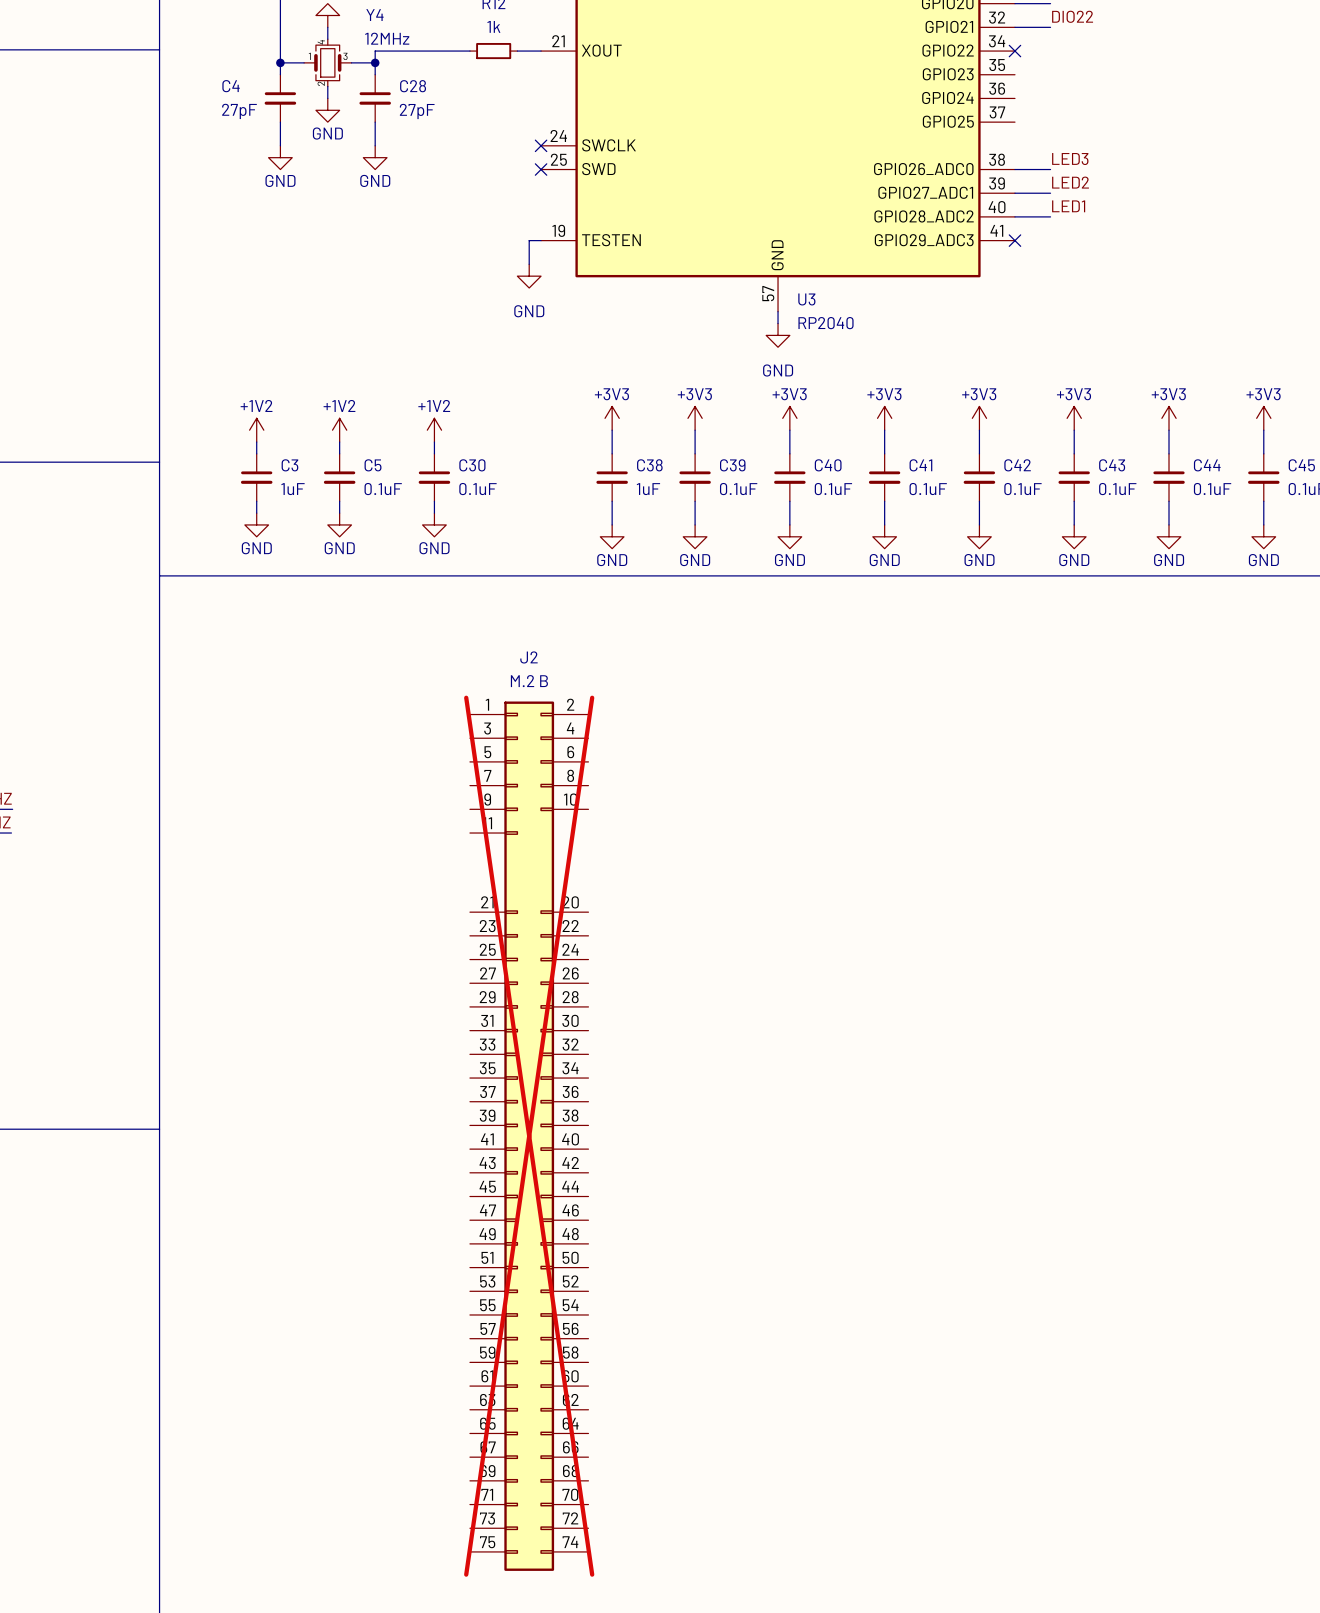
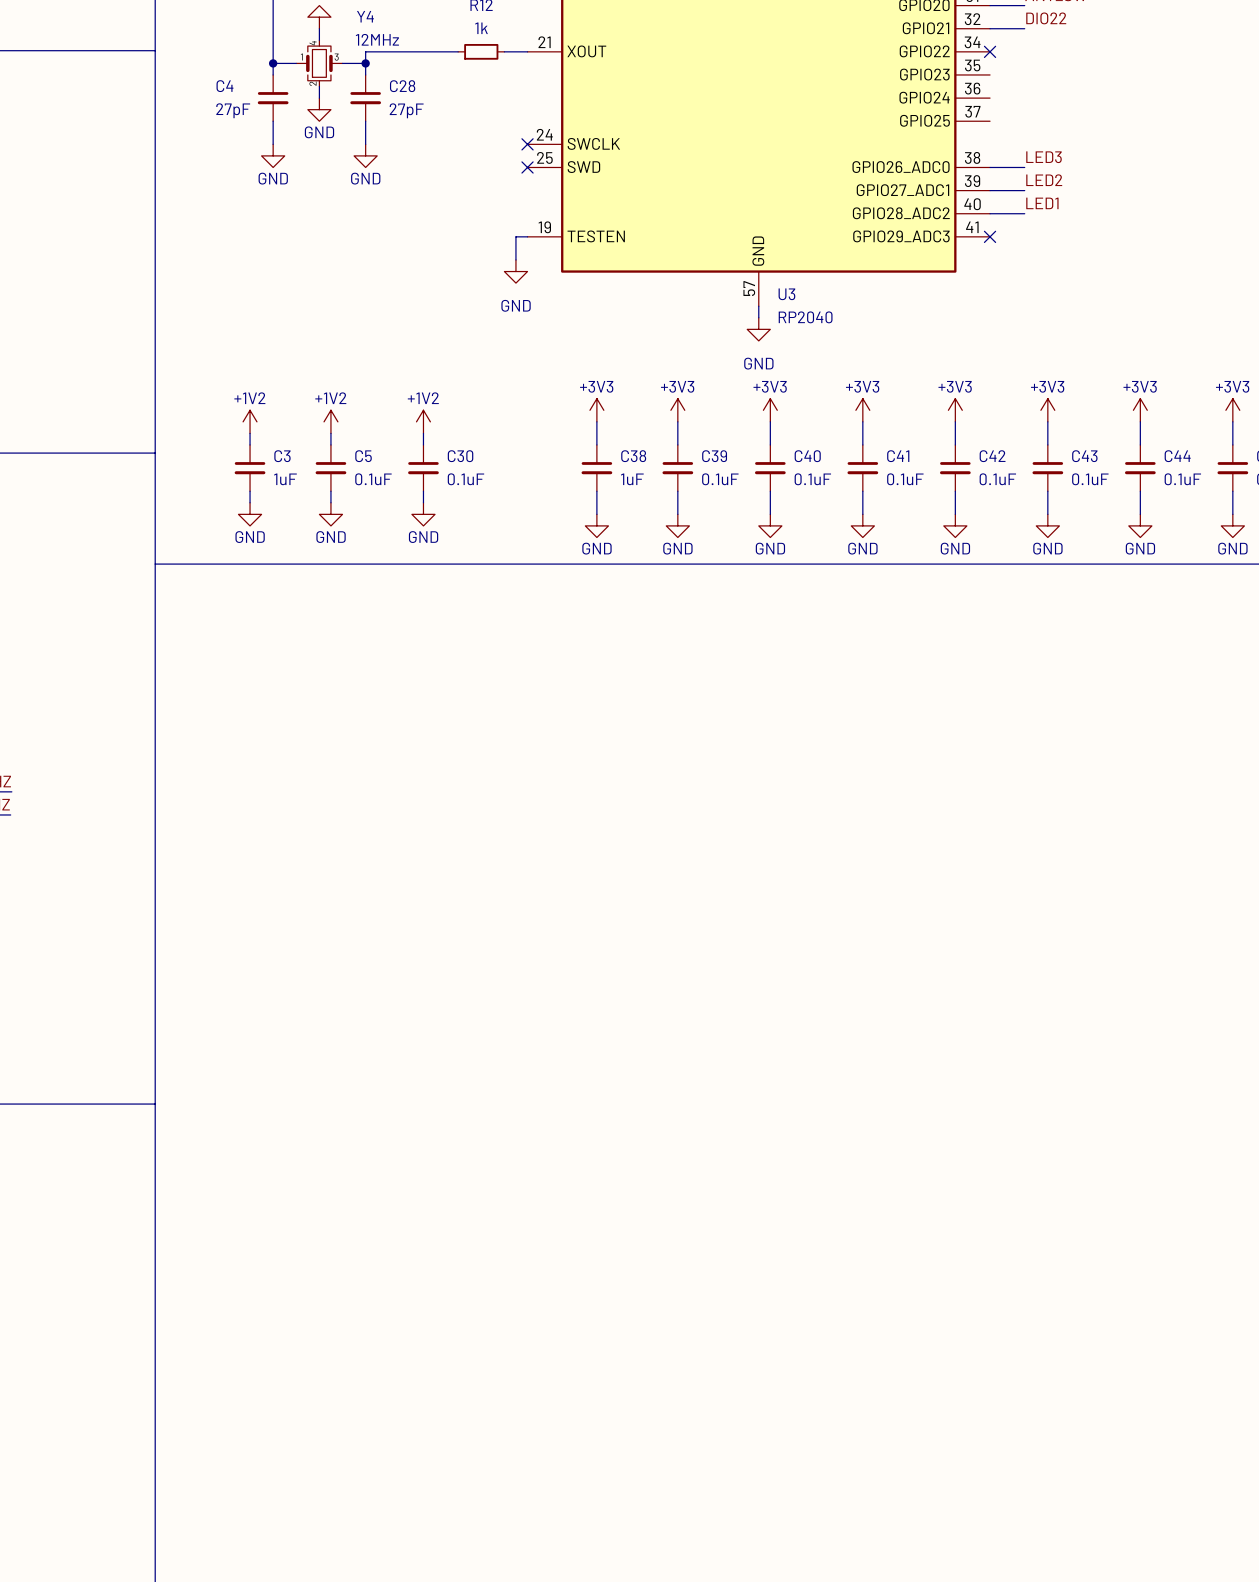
J2: M.2 B (529, 1136) -> none

